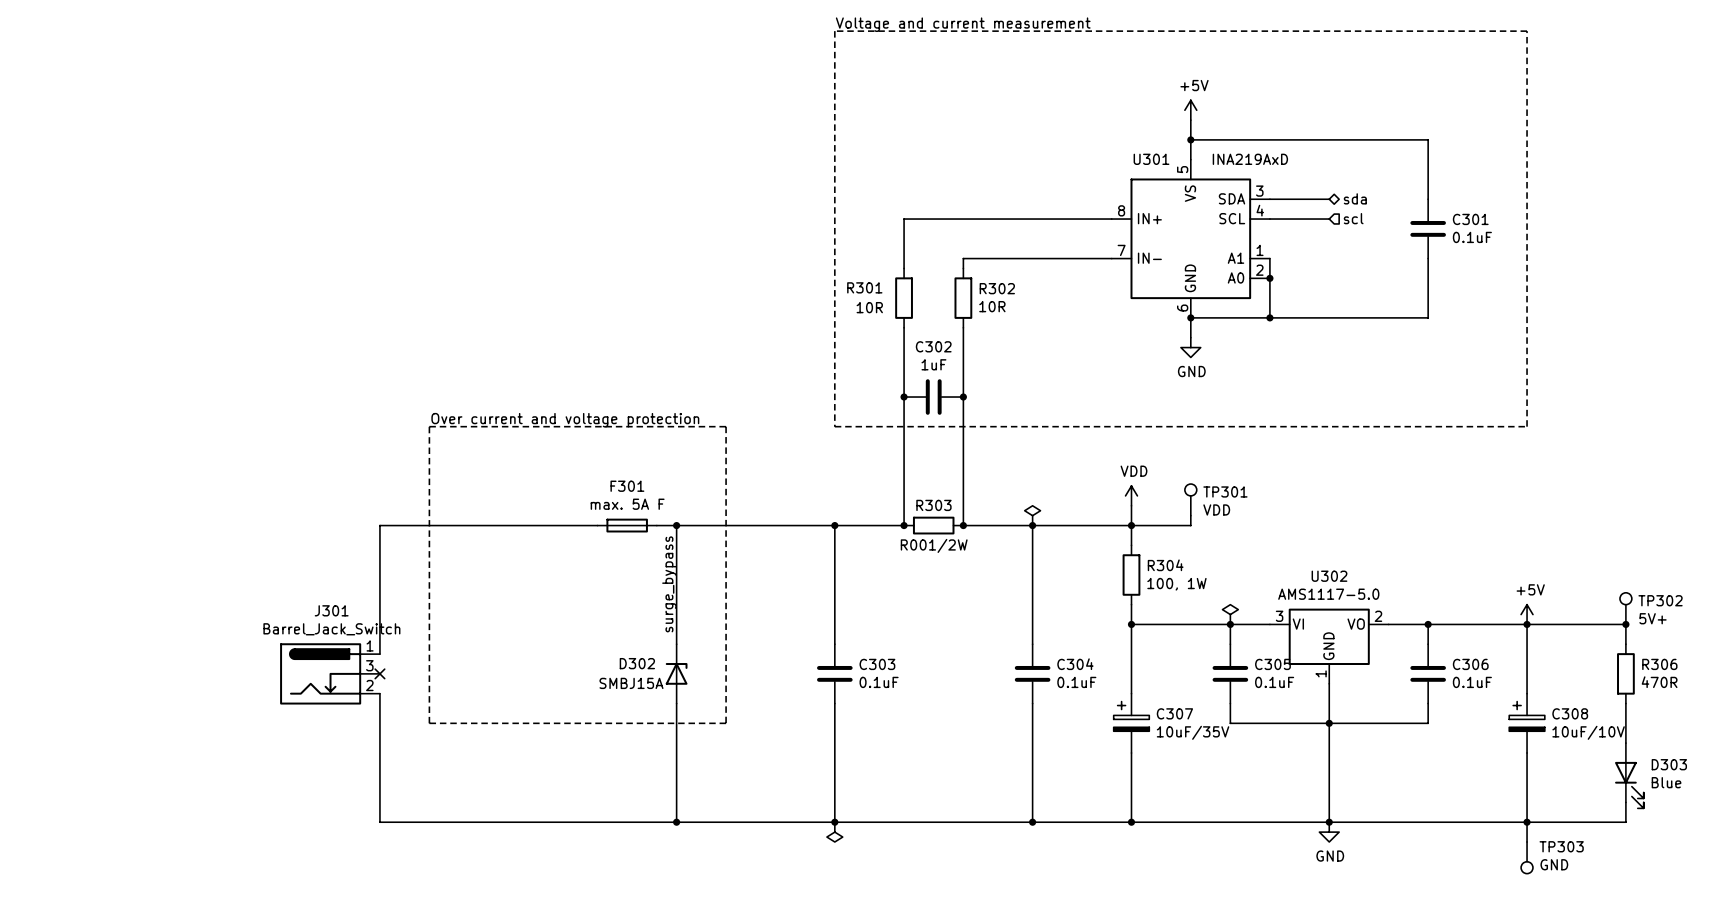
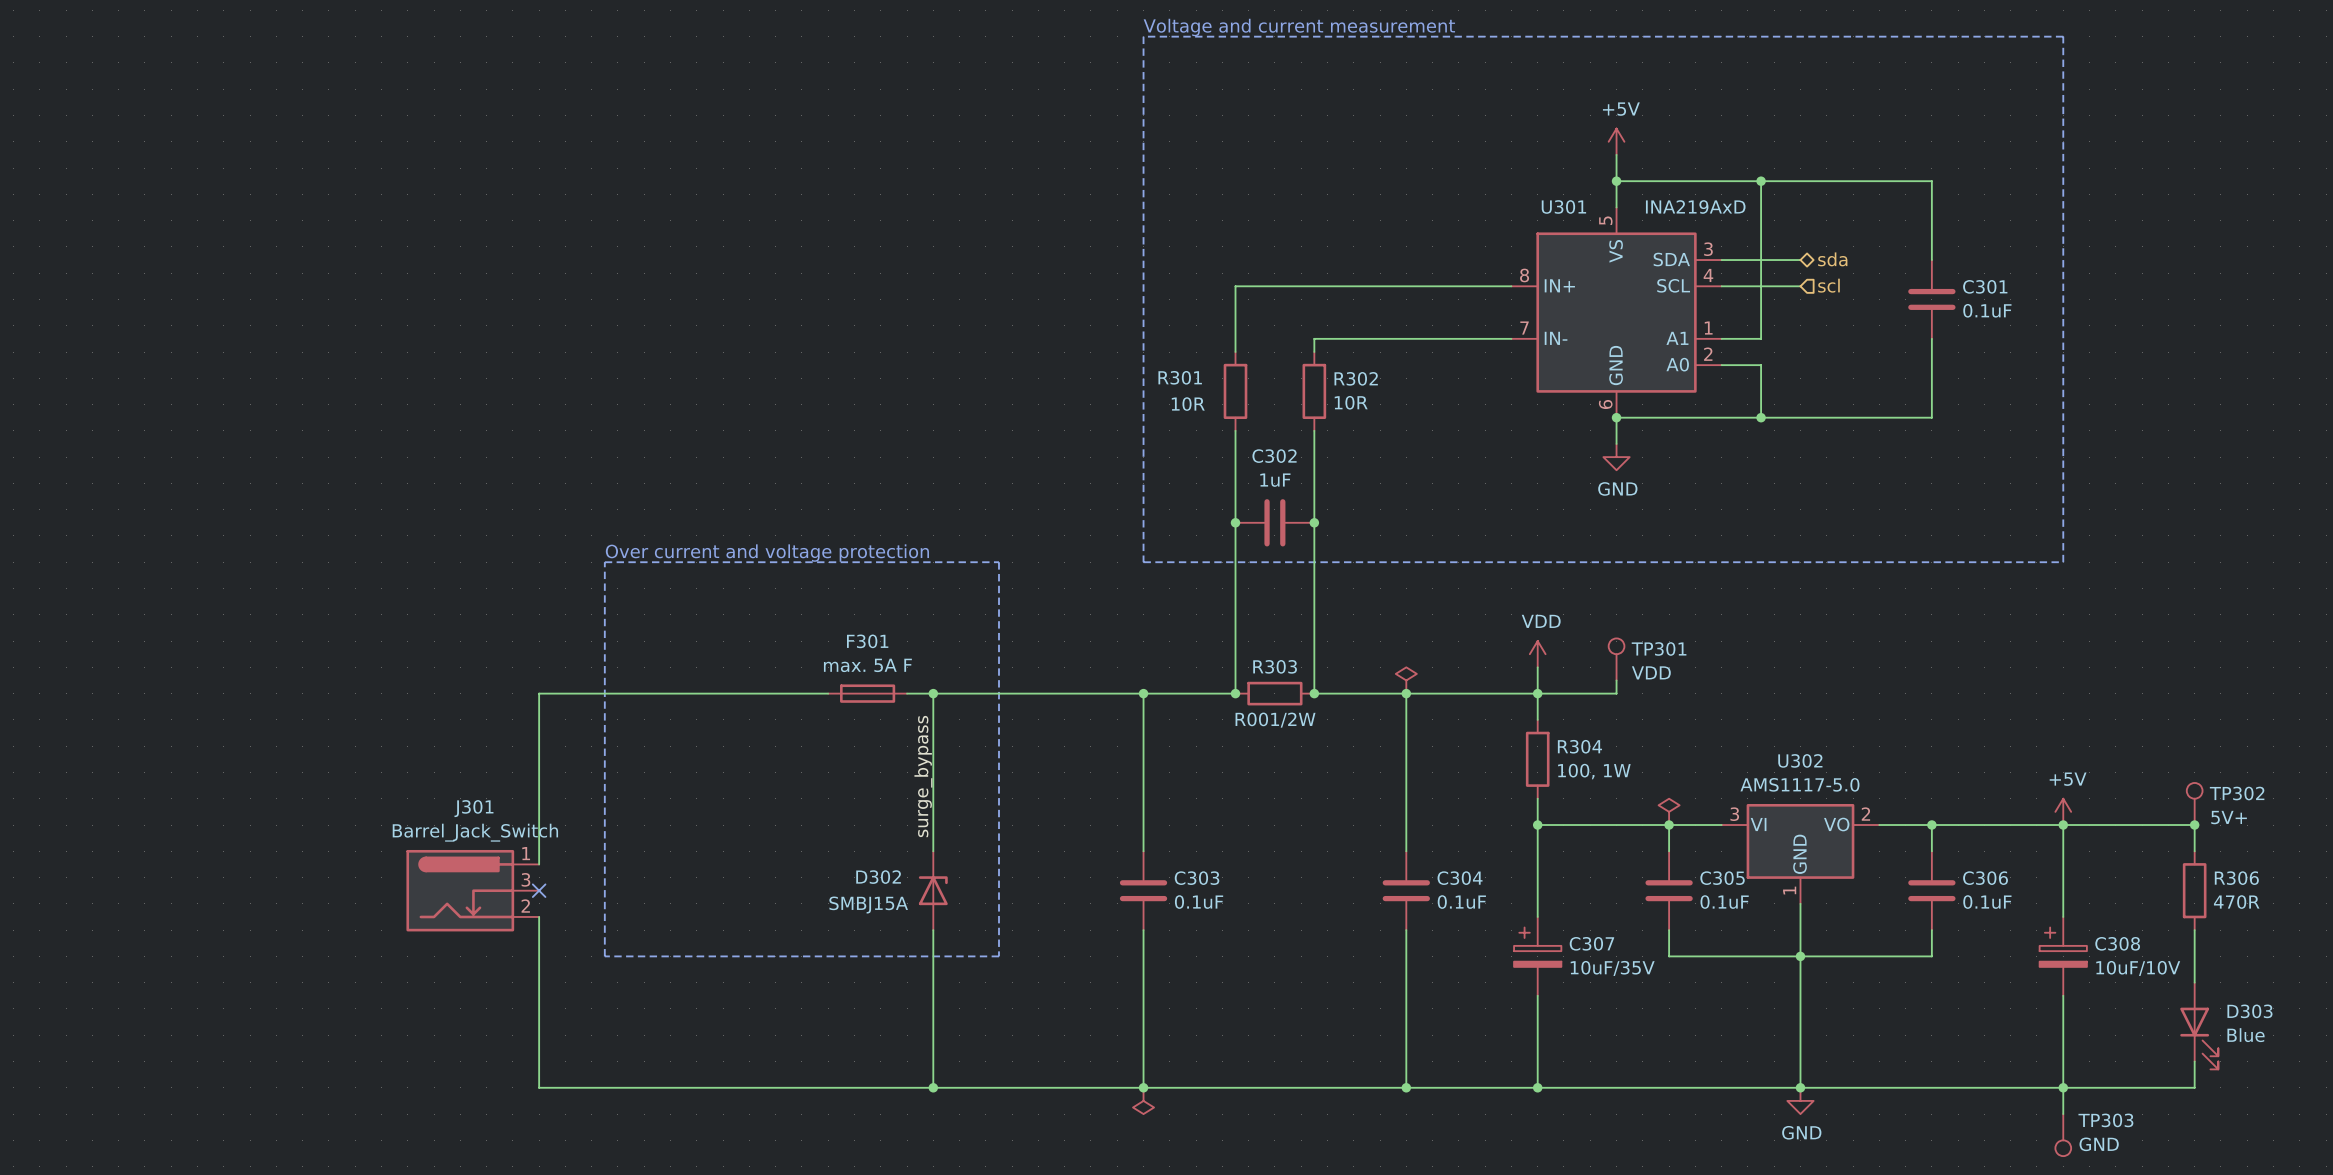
junction: none -> (1761, 181)
wire: (1269, 258) (1269, 317) -> (1721, 338) (1761, 338) (1761, 181)
wire: none -> (1721, 365) (1761, 365) (1761, 417)
junction: (1269, 278) -> none
junction: (1269, 317) -> none
junction: none -> (1761, 417)

